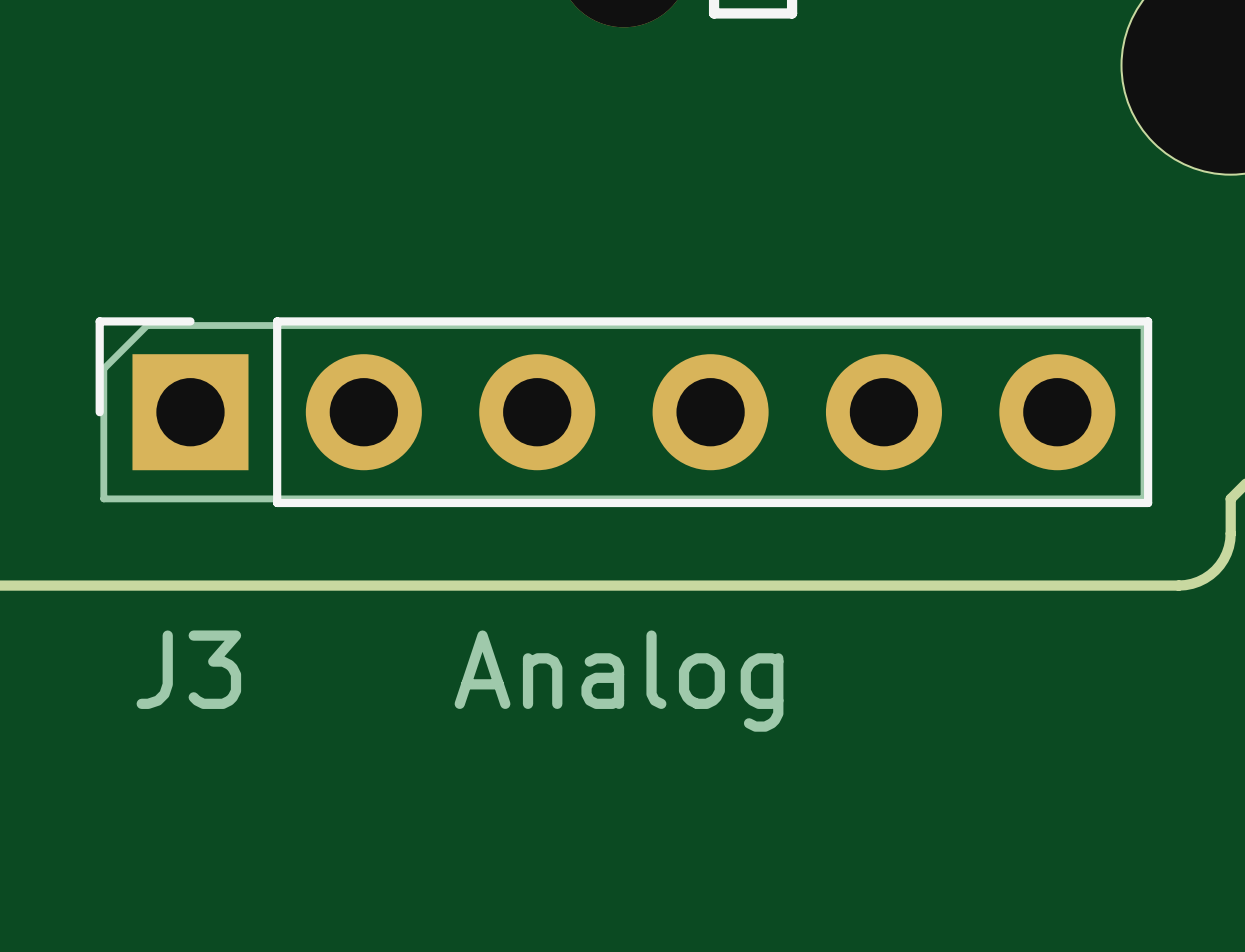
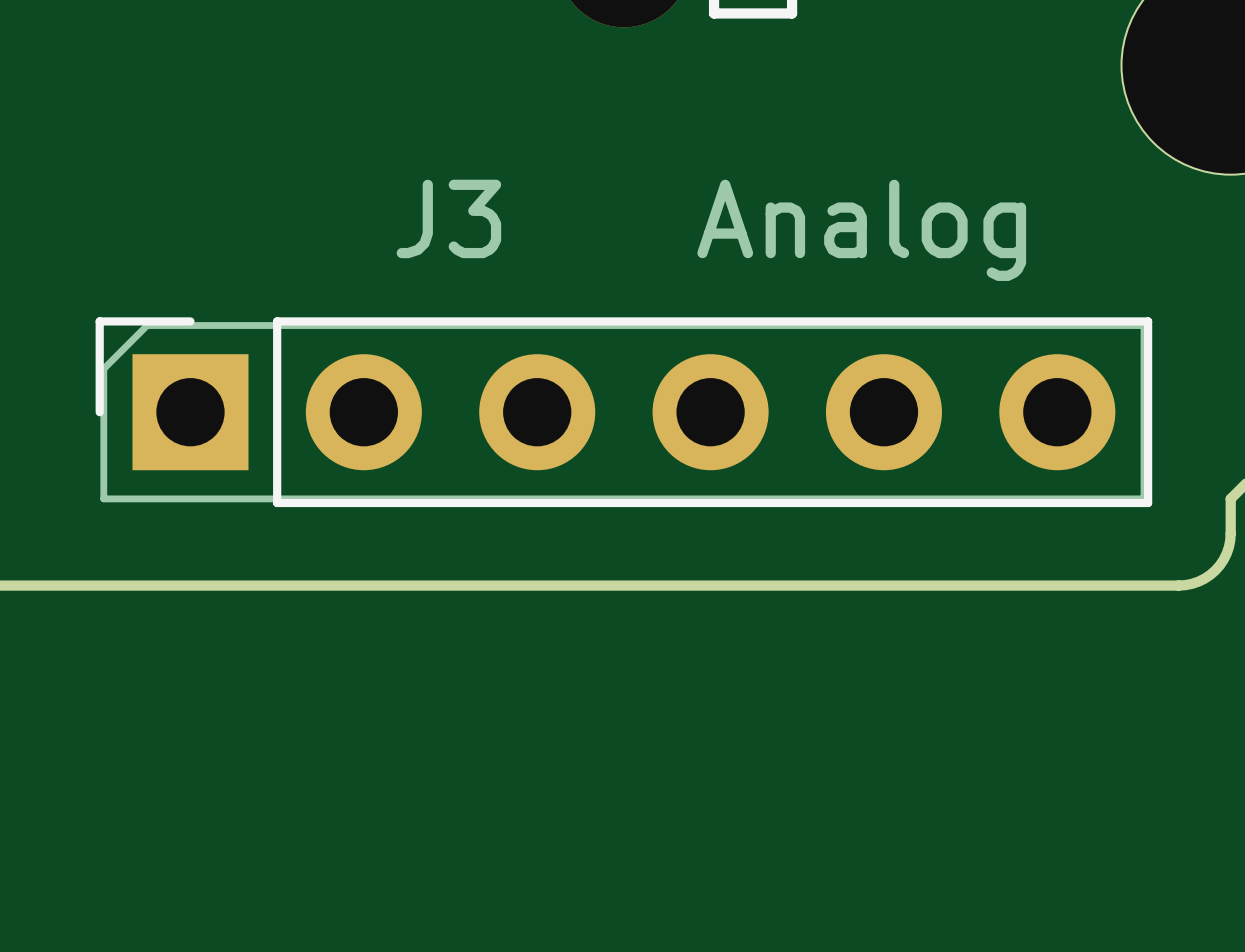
J3 name position: J3 (188, 669) -> J3 (448, 218)
J3 value position: Analog (619, 681) -> Analog (861, 230)

